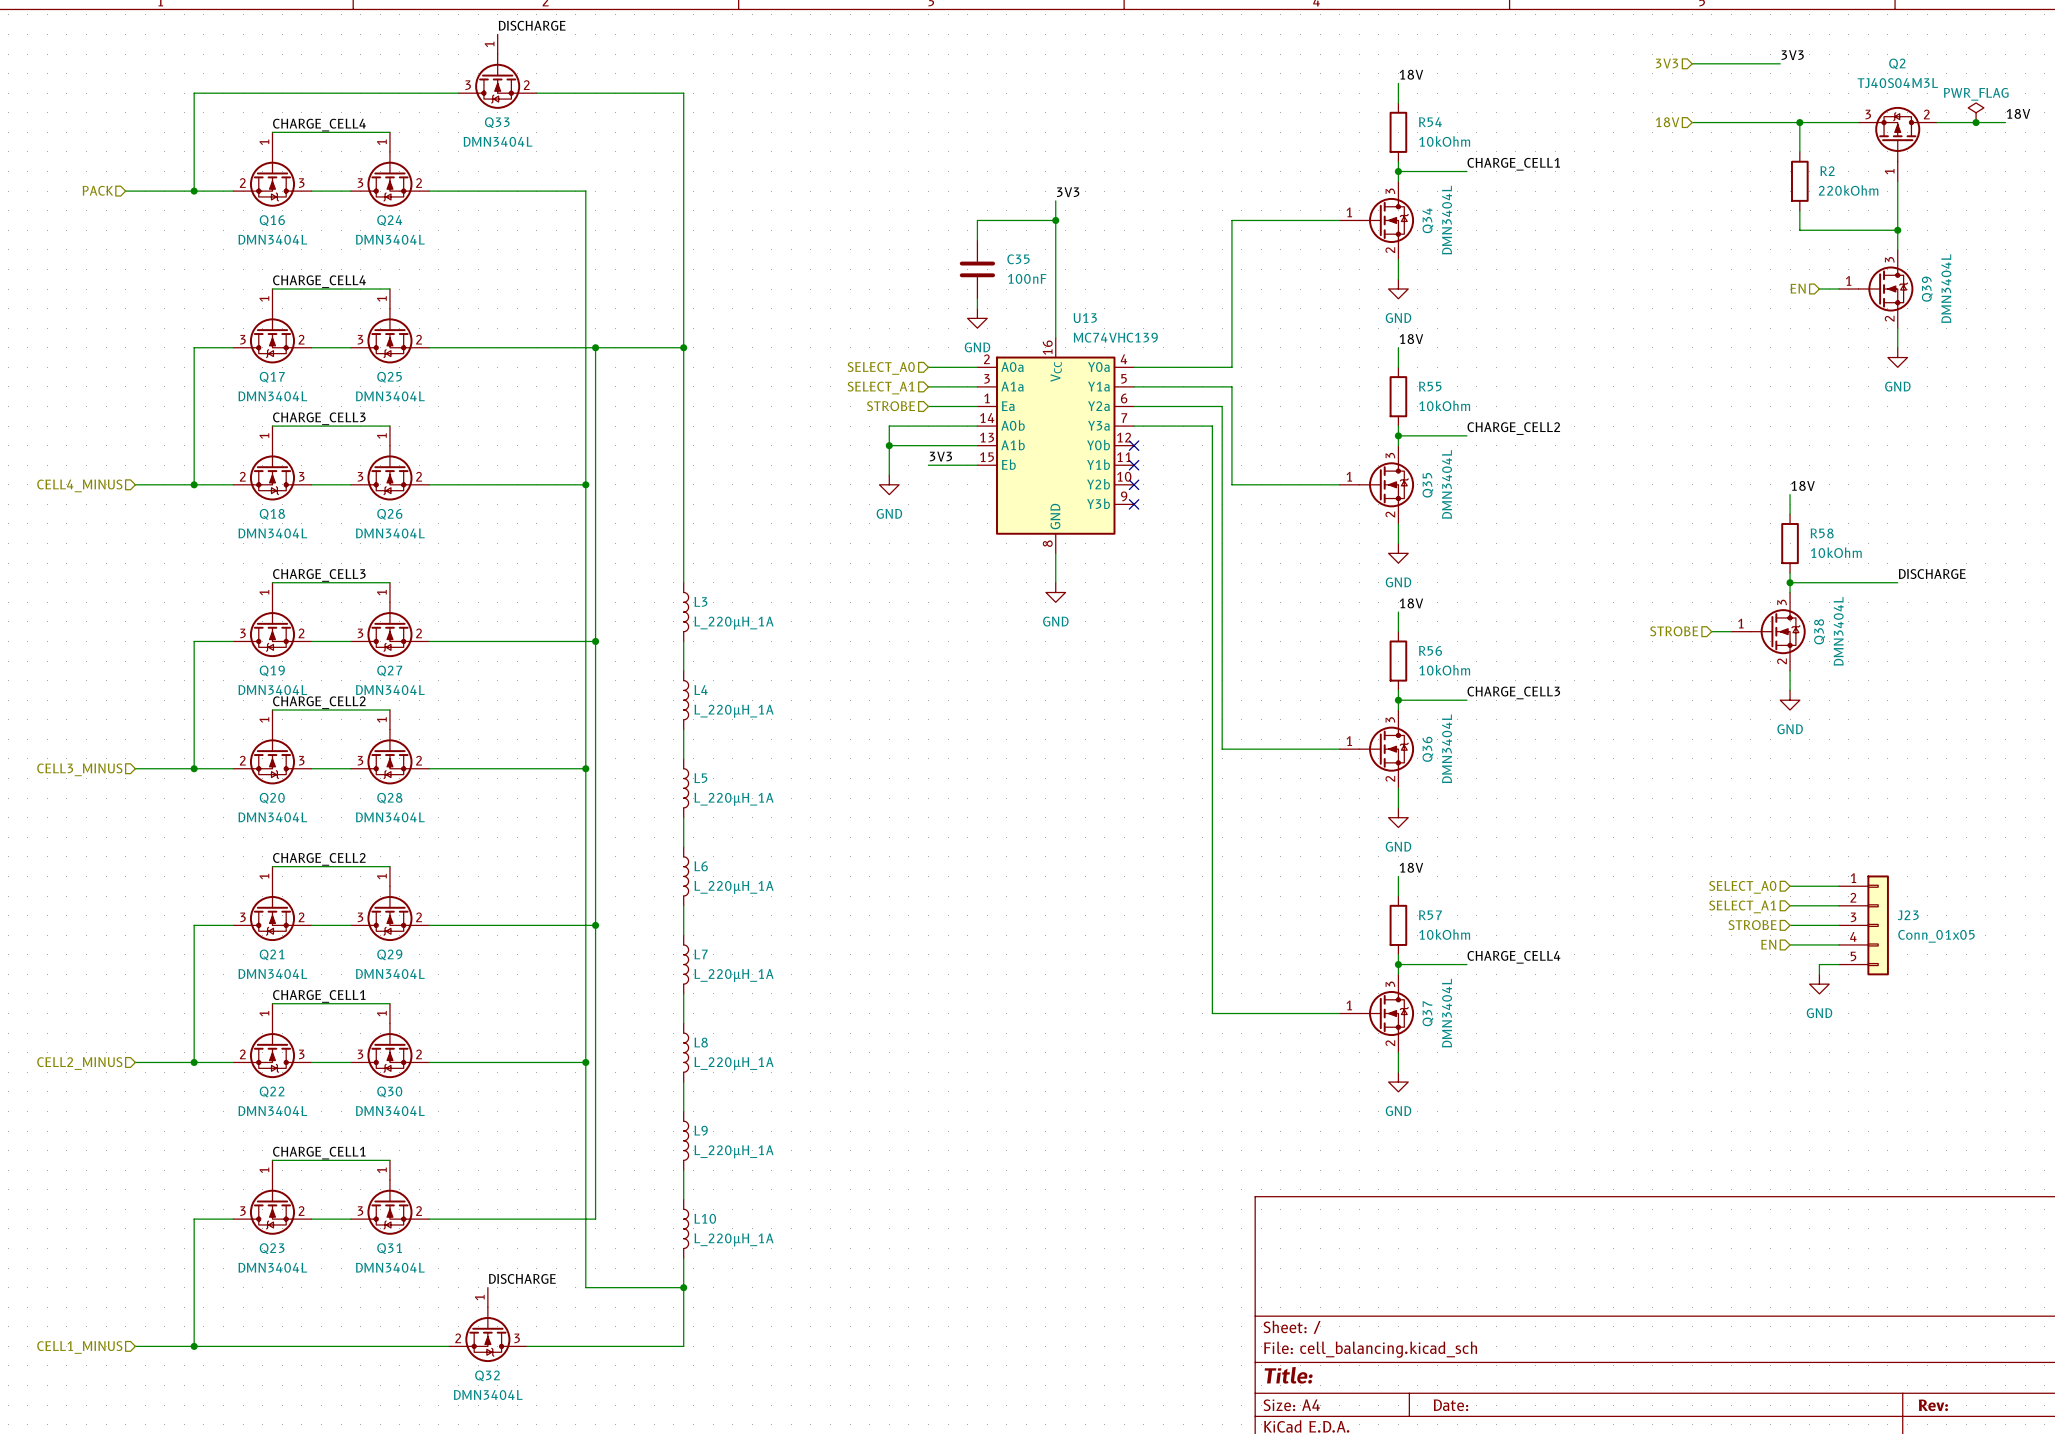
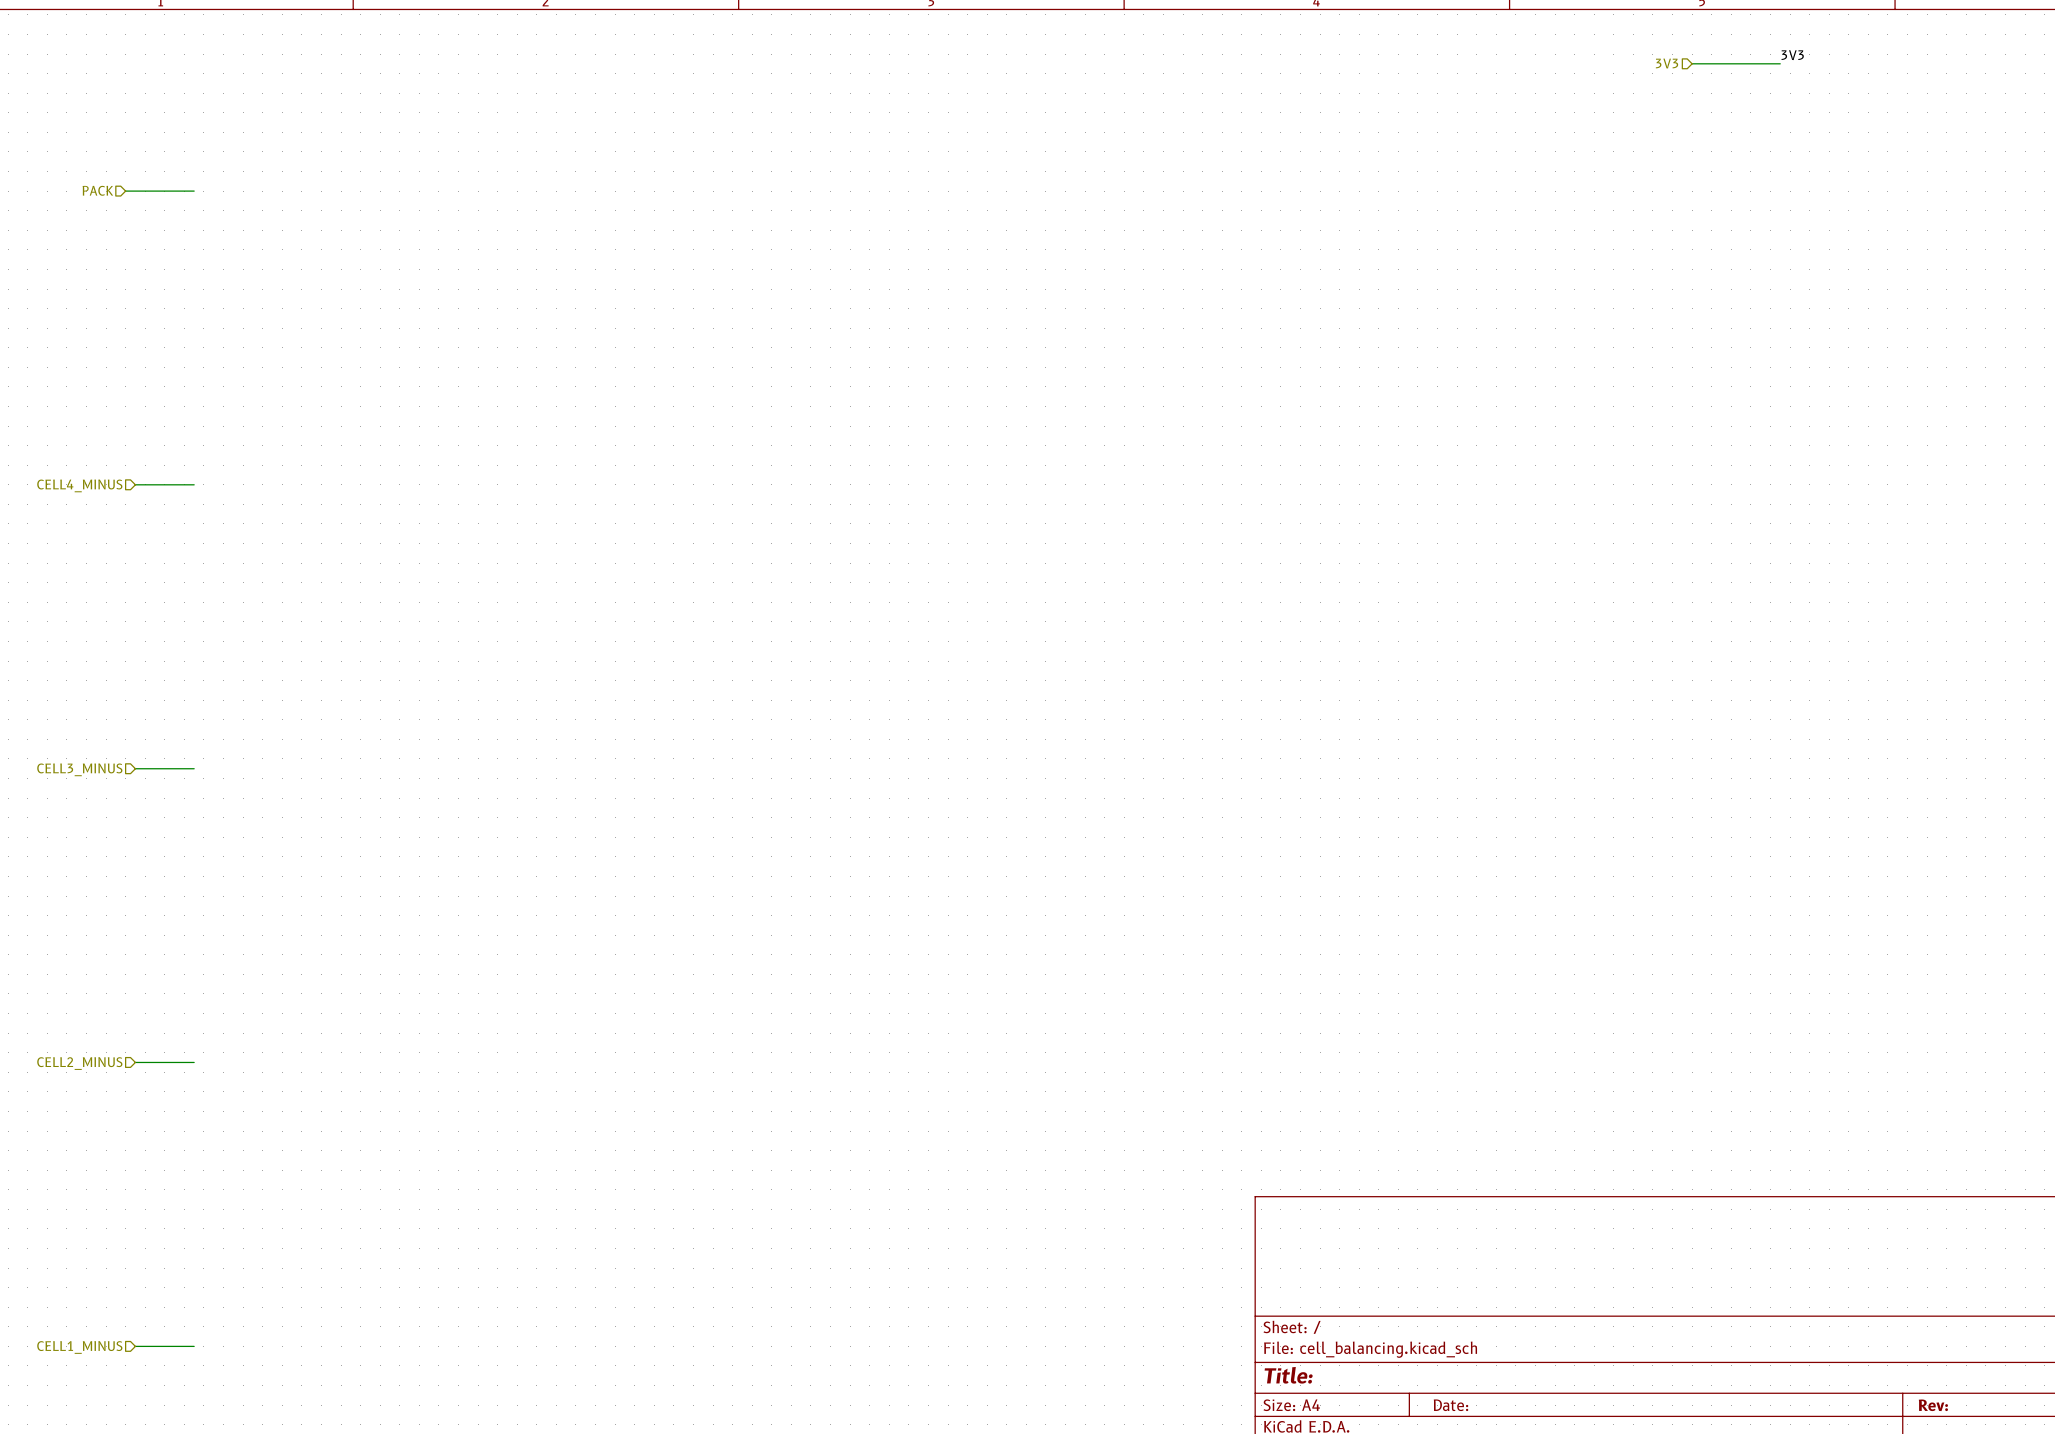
label: DISCHARGE (532, 25) -> none
Q33: DMN3404L (497, 71) -> none
label: 18V (1411, 74) -> none
wire: (1398, 83) (1398, 102) -> none
wire: (458, 93) (194, 93) (194, 191) (233, 191) -> none
wire: (536, 93) (683, 93) (683, 582) -> none
power symbol: PWR_FLAG (1976, 112) -> none
label: 18V (2018, 113) -> none
hierarchical label: 18V (1667, 122) -> none
wire: (1692, 122) (1858, 122) -> none
wire: (1799, 122) (1799, 151) -> none
junction: (1799, 122) -> none
wire: (1936, 122) (2005, 122) -> none
junction: (1976, 122) -> none
label: CHARGE_CELL4 (319, 125) -> none
wire: (272, 132) (389, 132) -> none
R54: 10kOhm (1398, 132) -> none
Q2: TJ40S04M3L (1897, 144) -> none
wire: (1398, 161) (1398, 181) -> none
label: CHARGE_CELL1 (1513, 164) -> none
Q16: DMN3404L (272, 169) -> none
Q24: DMN3404L (389, 169) -> none
wire: (1398, 171) (1466, 171) -> none
junction: (1398, 171) -> none
R2: 220kOhm (1799, 181) -> none
wire: (1897, 181) (1897, 249) -> none
junction: (194, 191) -> none
wire: (311, 191) (350, 191) -> none
wire: (429, 191) (585, 191) (585, 1287) (683, 1287) -> none
label: 3V3 (1068, 192) -> none
wire: (1055, 200) (1055, 337) -> none
wire: (1799, 210) (1799, 230) (1897, 230) -> none
wire: (1055, 220) (977, 220) (977, 240) -> none
junction: (1055, 220) -> none
wire: (1339, 220) (1231, 220) (1231, 367) (1134, 367) -> none
Q34: DMN3404L (1376, 220) -> none
junction: (1897, 230) -> none
wire: (1398, 259) (1398, 279) -> none
C35: 100nF (977, 269) -> none
label: CHARGE_CELL4 (319, 281) -> none
hierarchical label: EN (1798, 288) -> none
wire: (272, 289) (389, 289) -> none
power symbol: GND (1398, 289) -> none
wire: (1819, 289) (1838, 289) -> none
Q39: DMN3404L (1876, 289) -> none
wire: (977, 298) (977, 308) -> none
power symbol: GND (977, 318) -> none
Q17: DMN3404L (272, 326) -> none
Q25: DMN3404L (389, 326) -> none
wire: (1897, 328) (1897, 347) -> none
label: 18V (1411, 339) -> none
wire: (233, 347) (194, 347) (194, 484) (233, 484) -> none
wire: (311, 347) (350, 347) -> none
wire: (429, 347) (683, 347) -> none
wire: (595, 347) (595, 1219) (429, 1219) -> none
junction: (595, 347) -> none
junction: (683, 347) -> none
wire: (1398, 347) (1398, 367) -> none
power symbol: GND (1897, 357) -> none
wire: (928, 367) (977, 367) -> none
hierarchical label: SELECT_A0 (881, 368) -> none
wire: (928, 386) (977, 386) -> none
wire: (1134, 386) (1231, 386) (1231, 484) (1339, 484) -> none
hierarchical label: SELECT_A1 (881, 388) -> none
R55: 10kOhm (1398, 396) -> none
hierarchical label: STROBE (890, 406) -> none
wire: (928, 406) (977, 406) -> none
wire: (1134, 406) (1222, 406) (1222, 749) (1339, 749) -> none
label: CHARGE_CELL3 (319, 418) -> none
wire: (272, 426) (389, 426) -> none
wire: (977, 426) (889, 426) (889, 475) -> none
wire: (1134, 426) (1212, 426) (1212, 1013) (1339, 1013) -> none
wire: (1398, 426) (1398, 445) -> none
label: CHARGE_CELL2 (1513, 428) -> none
wire: (1398, 435) (1466, 435) -> none
junction: (1398, 435) -> none
wire: (889, 445) (977, 445) -> none
junction: (889, 445) -> none
U13: MC74VHC139 (1055, 445) -> none
no-connect mark: (1134, 445) -> none
label: 3V3 (940, 456) -> none
Q18: DMN3404L (272, 463) -> none
Q26: DMN3404L (389, 463) -> none
wire: (928, 465) (977, 465) -> none
no-connect mark: (1134, 465) -> none
junction: (194, 484) -> none
wire: (311, 484) (350, 484) -> none
wire: (429, 484) (585, 484) -> none
junction: (585, 484) -> none
power symbol: GND (889, 484) -> none
no-connect mark: (1134, 484) -> none
Q35: DMN3404L (1376, 484) -> none
label: 18V (1803, 485) -> none
wire: (1790, 494) (1790, 514) -> none
no-connect mark: (1134, 504) -> none
wire: (1398, 523) (1398, 543) -> none
R58: 10kOhm (1790, 543) -> none
wire: (1055, 553) (1055, 582) -> none
power symbol: GND (1398, 553) -> none
wire: (1790, 572) (1790, 592) -> none
label: DISCHARGE (1932, 574) -> none
label: CHARGE_CELL3 (319, 575) -> none
wire: (272, 582) (389, 582) -> none
wire: (1790, 582) (1897, 582) -> none
junction: (1790, 582) -> none
power symbol: GND (1055, 592) -> none
label: 18V (1411, 603) -> none
L3: L_220µH_1A (686, 612) -> none
wire: (1398, 612) (1398, 631) -> none
Q19: DMN3404L (272, 619) -> none
Q27: DMN3404L (389, 619) -> none
hierarchical label: STROBE (1674, 631) -> none
wire: (1711, 631) (1731, 631) -> none
Q38: DMN3404L (1768, 631) -> none
wire: (233, 641) (194, 641) (194, 768) (233, 768) -> none
wire: (311, 641) (350, 641) -> none
wire: (429, 641) (595, 641) -> none
junction: (595, 641) -> none
wire: (683, 641) (683, 670) -> none
R56: 10kOhm (1398, 661) -> none
wire: (1790, 670) (1790, 690) -> none
wire: (1398, 690) (1398, 710) -> none
label: CHARGE_CELL3 (1513, 692) -> none
L4: L_220µH_1A (686, 700) -> none
wire: (1398, 700) (1466, 700) -> none
junction: (1398, 700) -> none
power symbol: GND (1790, 700) -> none
label: CHARGE_CELL2 (319, 702) -> none
wire: (272, 710) (389, 710) -> none
wire: (683, 729) (683, 758) -> none
Q20: DMN3404L (272, 747) -> none
Q28: DMN3404L (389, 747) -> none
Q36: DMN3404L (1376, 749) -> none
junction: (194, 768) -> none
wire: (311, 768) (350, 768) -> none
wire: (429, 768) (585, 768) -> none
junction: (585, 768) -> none
L5: L_220µH_1A (686, 788) -> none
wire: (1398, 788) (1398, 807) -> none
wire: (683, 817) (683, 847) -> none
power symbol: GND (1398, 817) -> none
label: CHARGE_CELL2 (319, 859) -> none
wire: (272, 866) (389, 866) -> none
label: 18V (1411, 867) -> none
L6: L_220µH_1A (686, 876) -> none
wire: (1398, 876) (1398, 896) -> none
wire: (1790, 886) (1838, 886) -> none
hierarchical label: SELECT_A0 (1742, 887) -> none
Q21: DMN3404L (272, 903) -> none
Q29: DMN3404L (389, 903) -> none
wire: (683, 905) (683, 935) -> none
wire: (1790, 905) (1838, 905) -> none
hierarchical label: SELECT_A1 (1742, 906) -> none
wire: (233, 925) (194, 925) (194, 1062) (233, 1062) -> none
wire: (311, 925) (350, 925) -> none
wire: (429, 925) (595, 925) -> none
junction: (595, 925) -> none
R57: 10kOhm (1398, 925) -> none
hierarchical label: STROBE (1752, 925) -> none
wire: (1790, 925) (1838, 925) -> none
J23: Conn_01x05 (1863, 925) -> none
hierarchical label: EN (1768, 944) -> none
wire: (1790, 944) (1838, 944) -> none
wire: (1398, 954) (1398, 974) -> none
label: CHARGE_CELL4 (1513, 957) -> none
L7: L_220µH_1A (686, 964) -> none
wire: (1398, 964) (1466, 964) -> none
junction: (1398, 964) -> none
wire: (1838, 964) (1819, 964) (1819, 974) -> none
power symbol: GND (1819, 984) -> none
wire: (683, 993) (683, 1023) -> none
label: CHARGE_CELL1 (319, 996) -> none
wire: (272, 1003) (389, 1003) -> none
Q37: DMN3404L (1376, 1013) -> none
Q22: DMN3404L (272, 1040) -> none
Q30: DMN3404L (389, 1040) -> none
L8: L_220µH_1A (686, 1052) -> none
wire: (1398, 1052) (1398, 1072) -> none
junction: (194, 1062) -> none
wire: (311, 1062) (350, 1062) -> none
wire: (429, 1062) (585, 1062) -> none
junction: (585, 1062) -> none
wire: (683, 1082) (683, 1111) -> none
power symbol: GND (1398, 1082) -> none
L9: L_220µH_1A (686, 1140) -> none
label: CHARGE_CELL1 (319, 1153) -> none
wire: (272, 1160) (389, 1160) -> none
wire: (683, 1170) (683, 1199) -> none
Q23: DMN3404L (272, 1197) -> none
Q31: DMN3404L (389, 1197) -> none
wire: (233, 1219) (194, 1219) (194, 1346) (448, 1346) -> none
wire: (311, 1219) (350, 1219) -> none
L10: L_220µH_1A (686, 1228) -> none
wire: (683, 1258) (683, 1346) (527, 1346) -> none
label: DISCHARGE (522, 1278) -> none
junction: (683, 1287) -> none
Q32: DMN3404L (487, 1324) -> none
junction: (194, 1346) -> none

